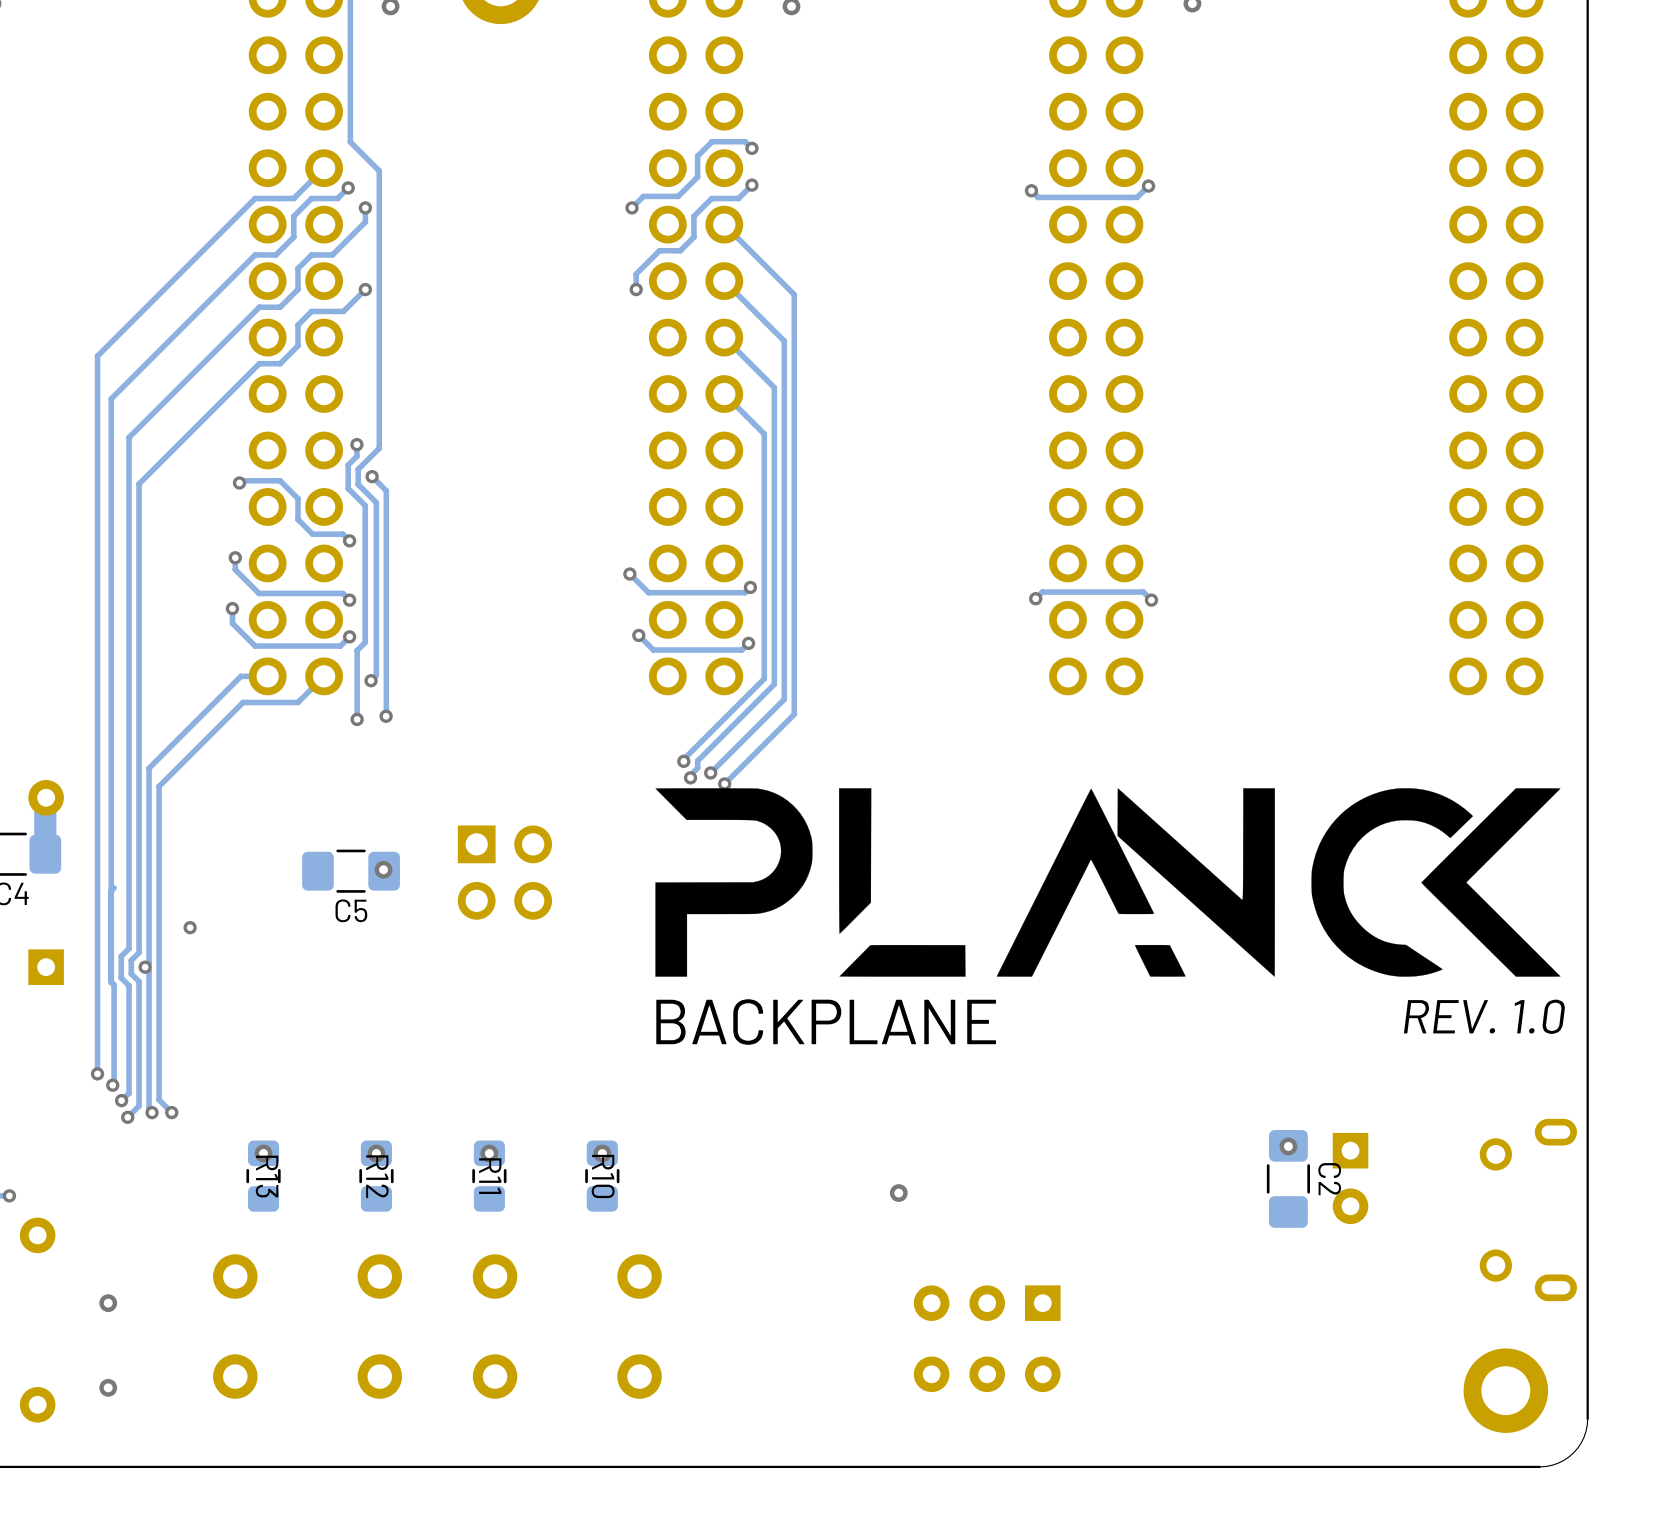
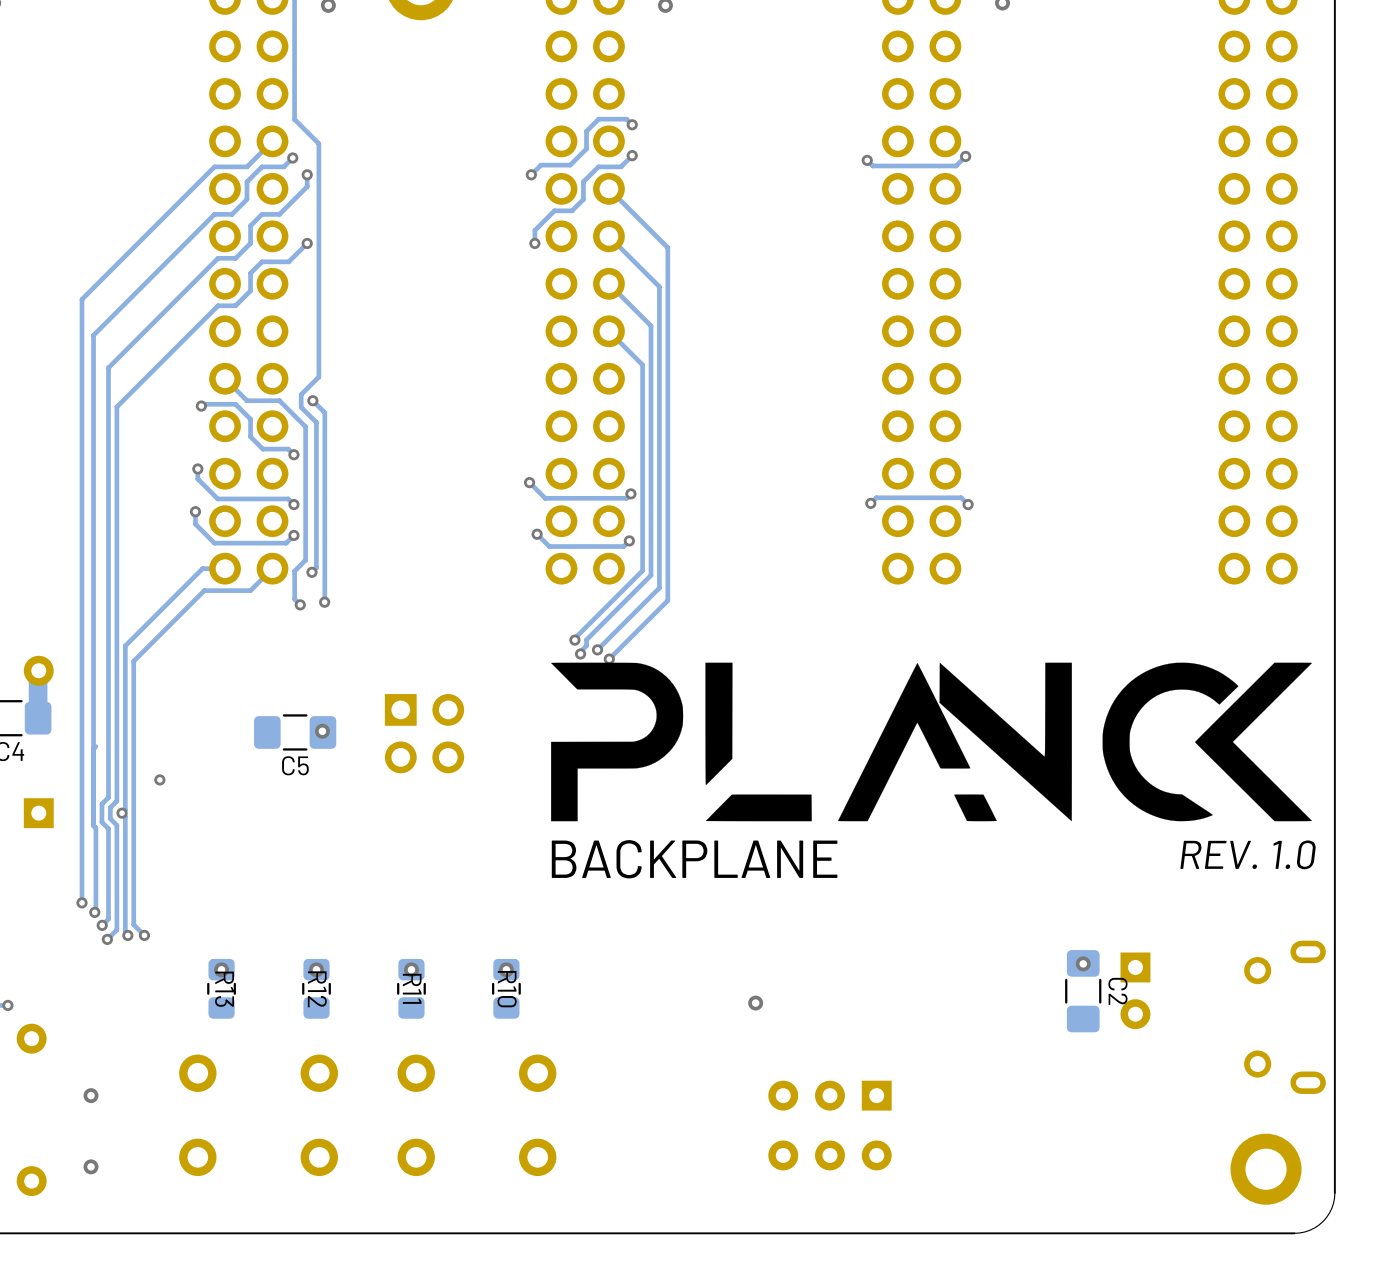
track: (356, 444) (356, 456) (348, 465) (348, 488) (365, 505) (365, 642) (357, 650) (357, 719) -> (225, 378) (247, 400) (279, 400) (305, 426) (305, 560) (294, 571) (294, 599) (300, 604)
via: (356, 444) -> none

